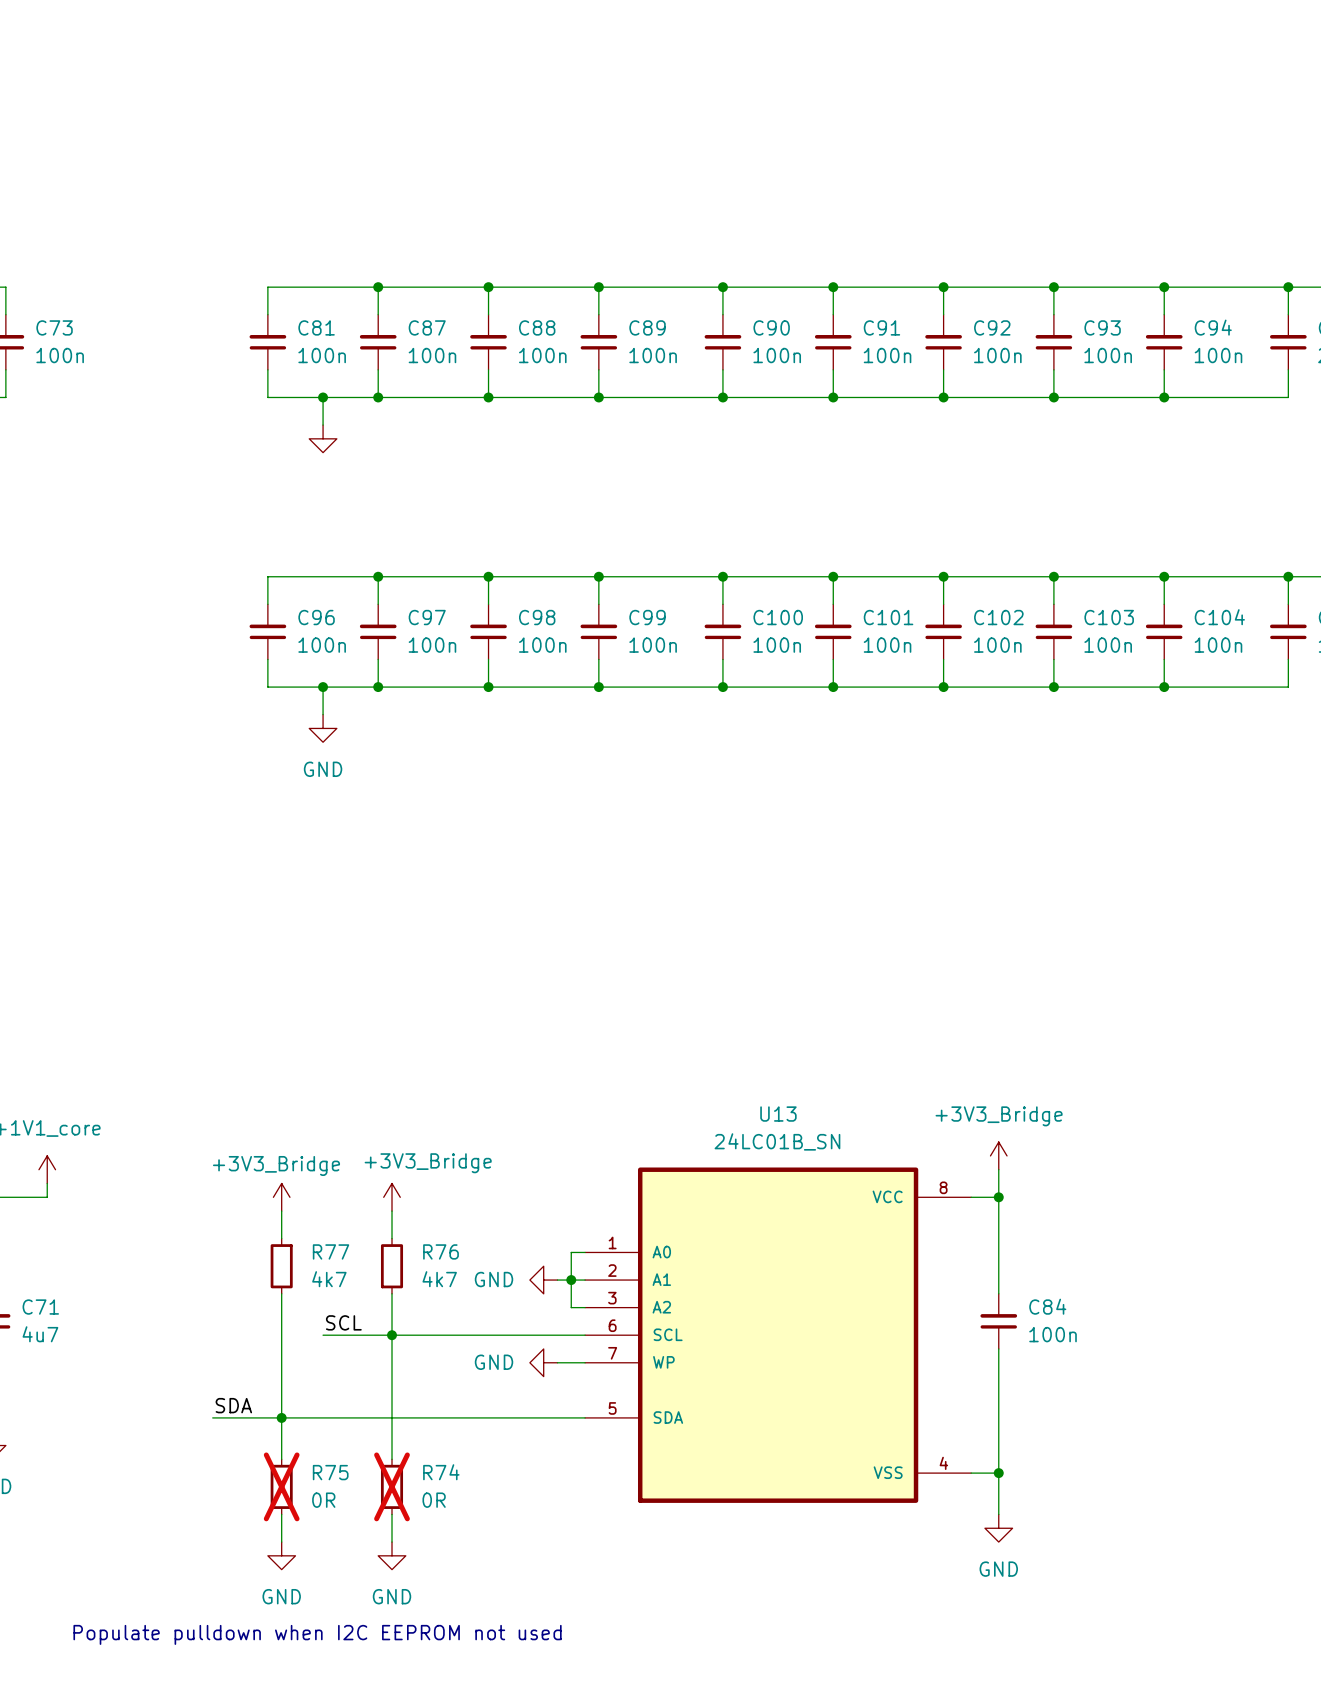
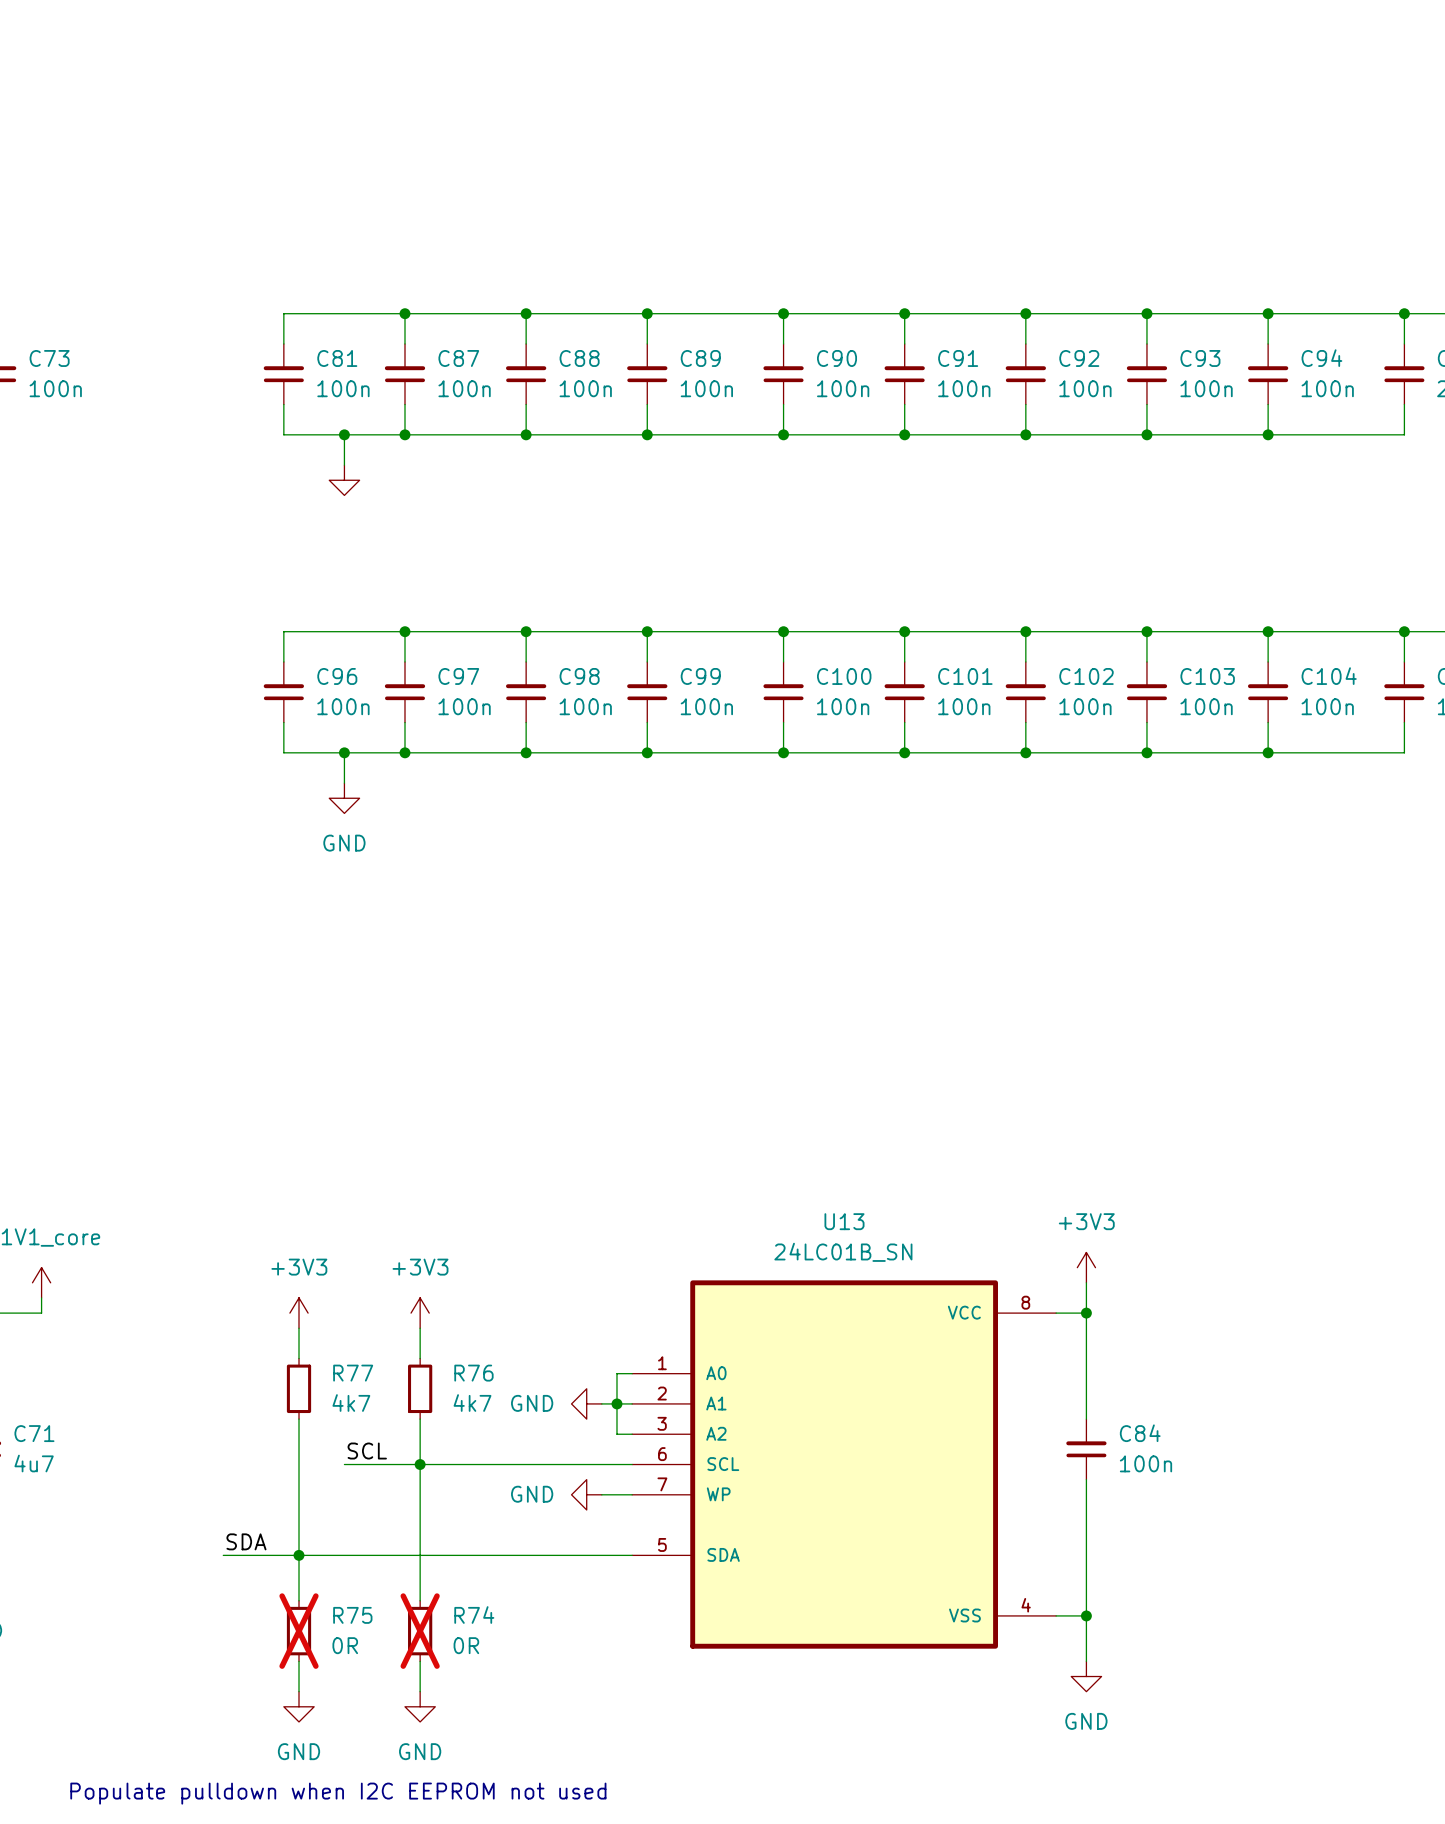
power symbol: +3V3_Bridge (998, 1155) -> +3V3 (1086, 1267)
power symbol: +3V3_Bridge (281, 1197) -> +3V3 (299, 1313)
power symbol: +3V3_Bridge (392, 1197) -> +3V3 (420, 1313)

